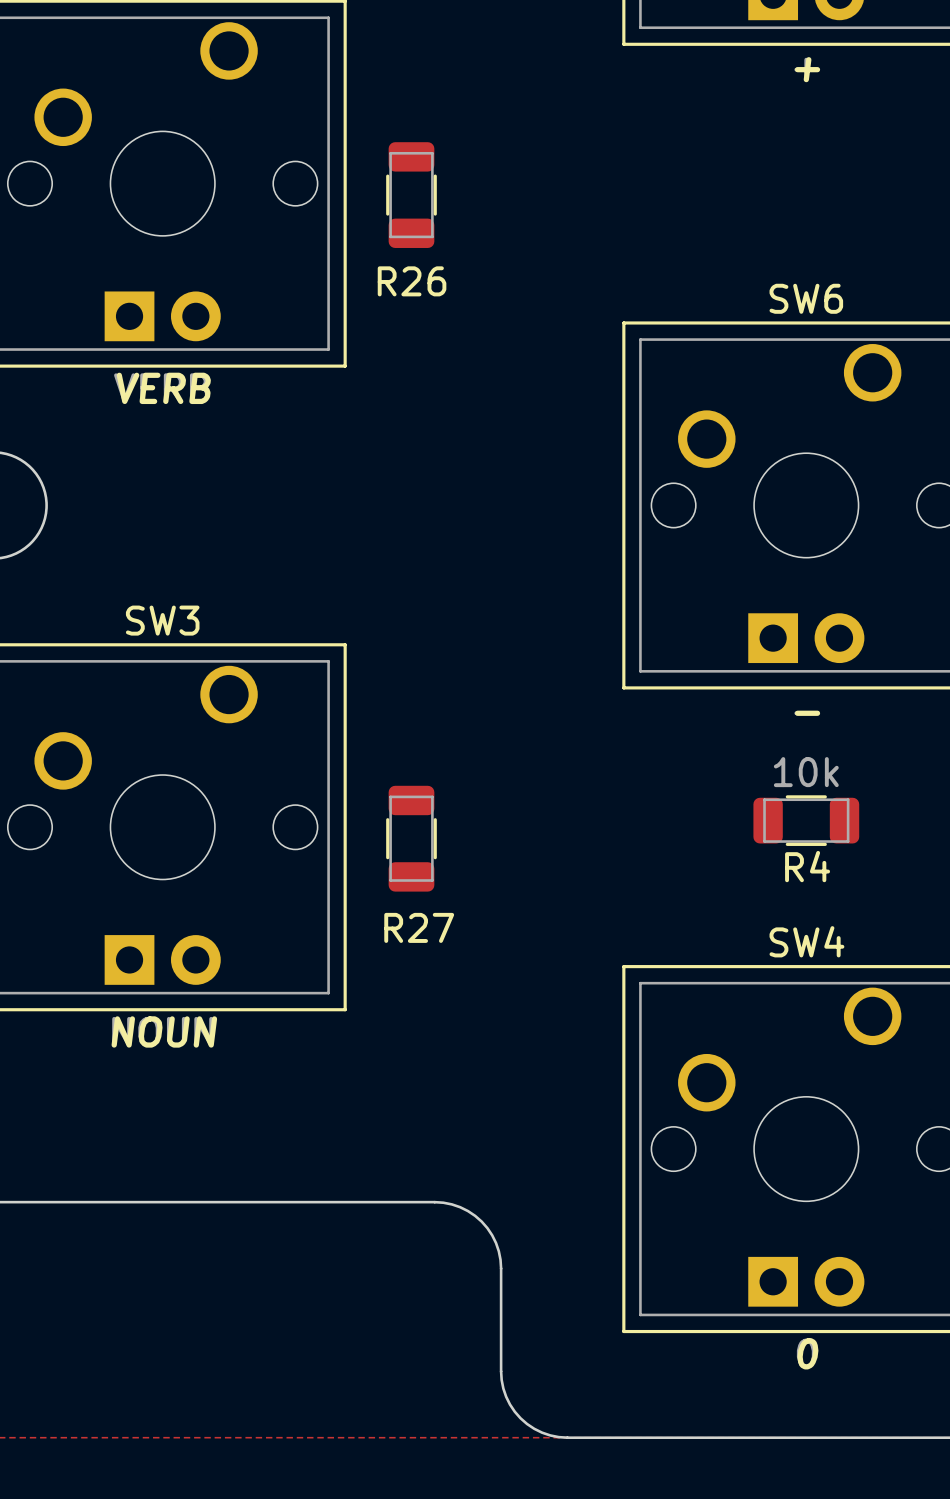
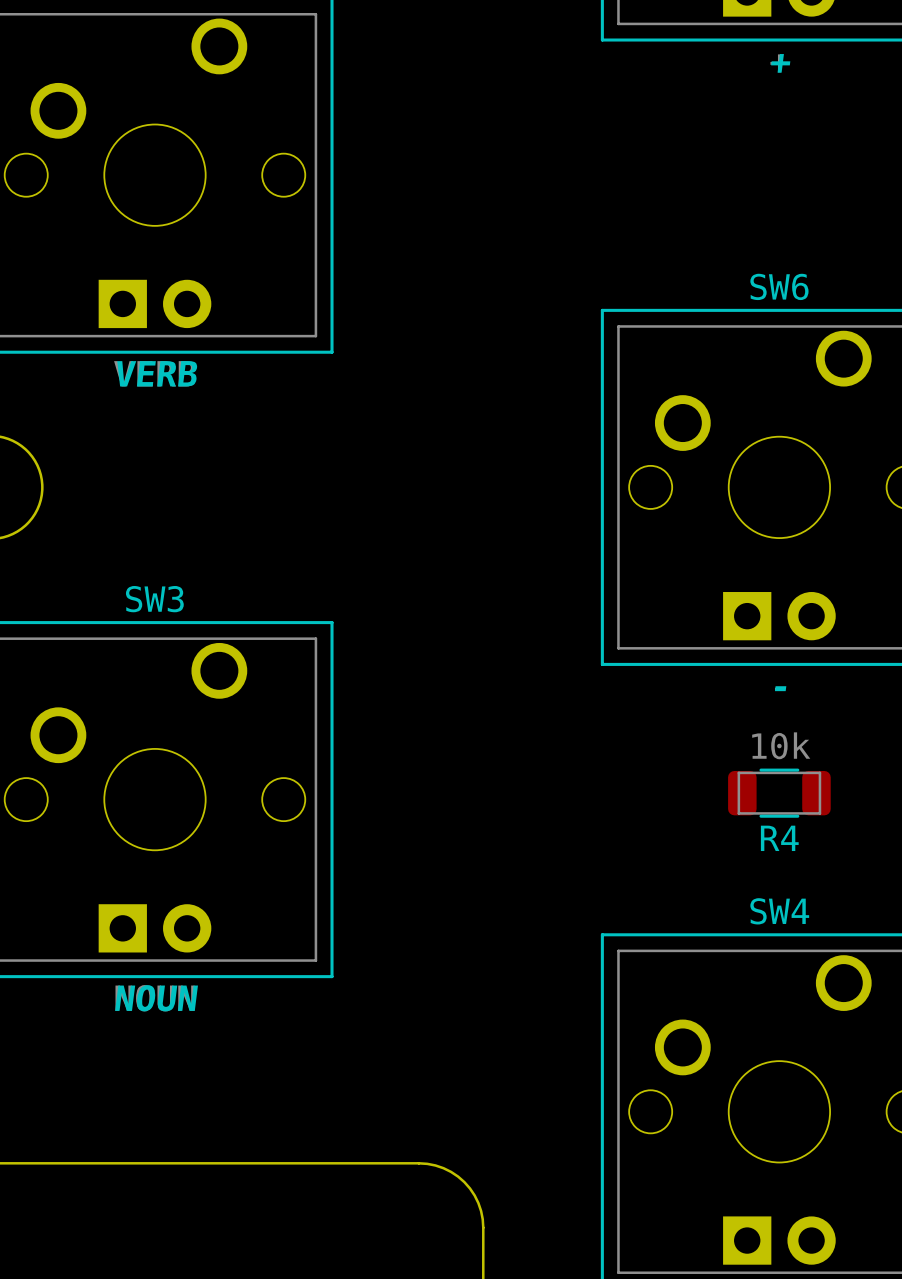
R26: (411, 195) -> none
R27: (411, 838) -> none

